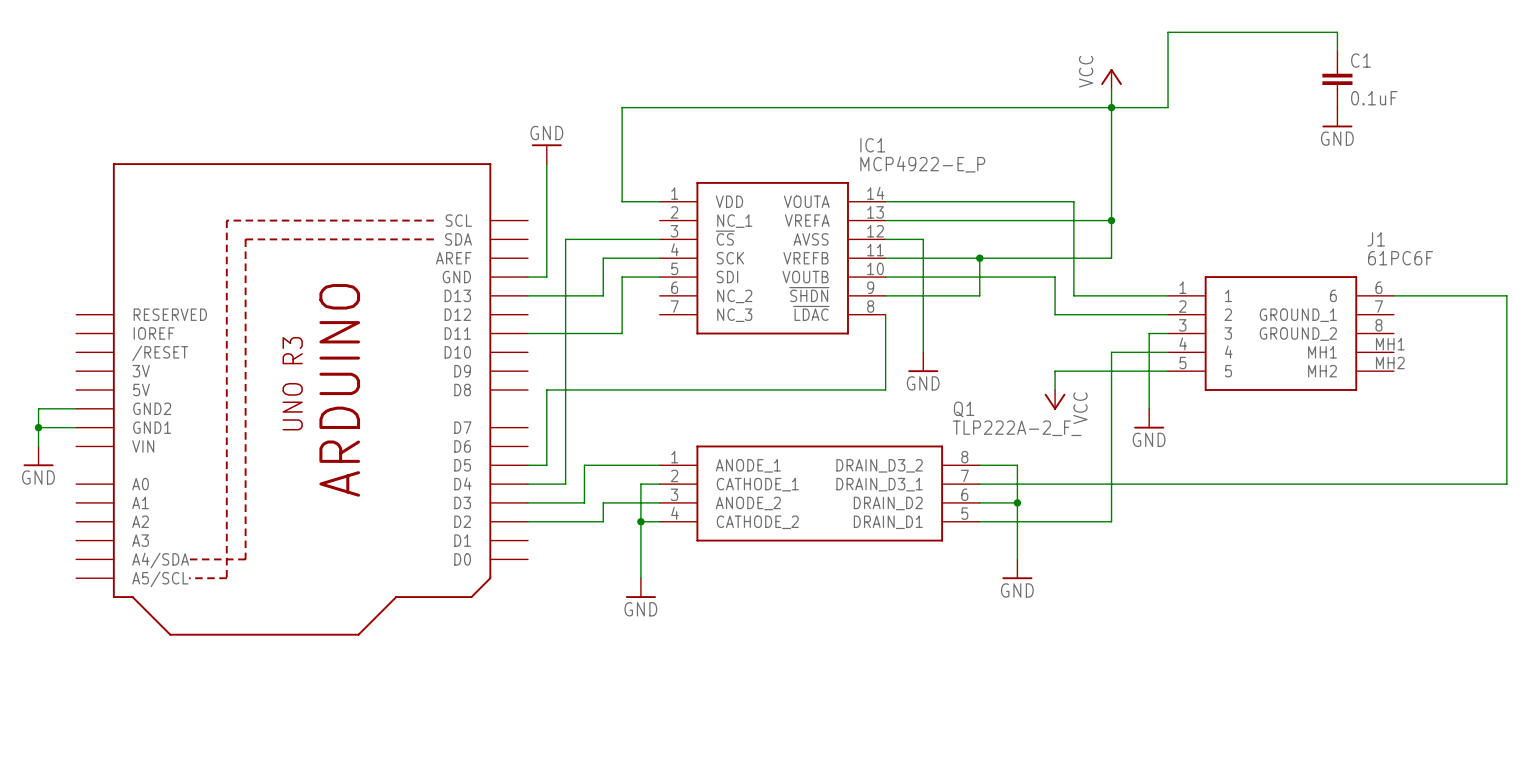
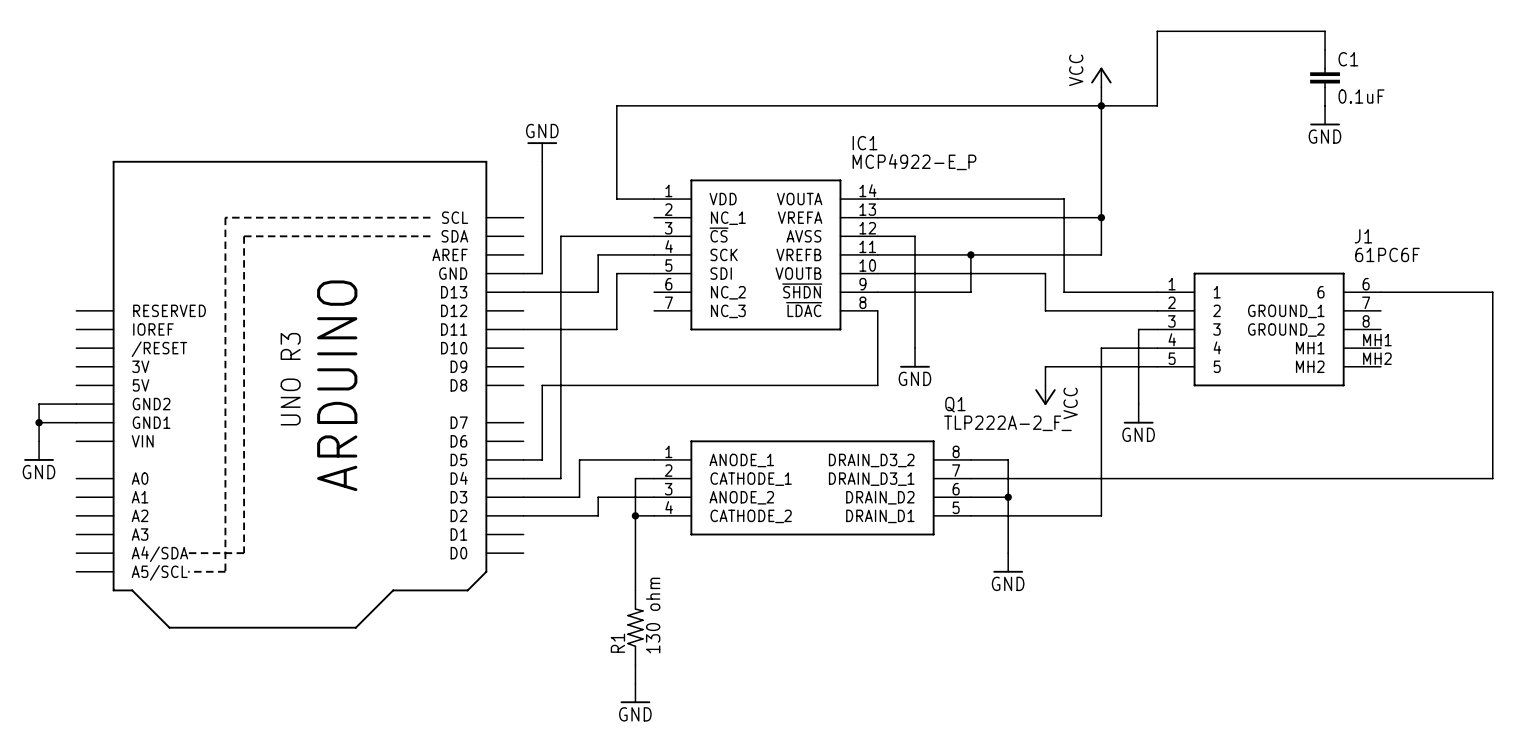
power symbol position: GND (640, 588) -> GND (635, 693)
R1: none -> 130 ohm (635, 627)
wire: none -> (635, 664) (635, 683)

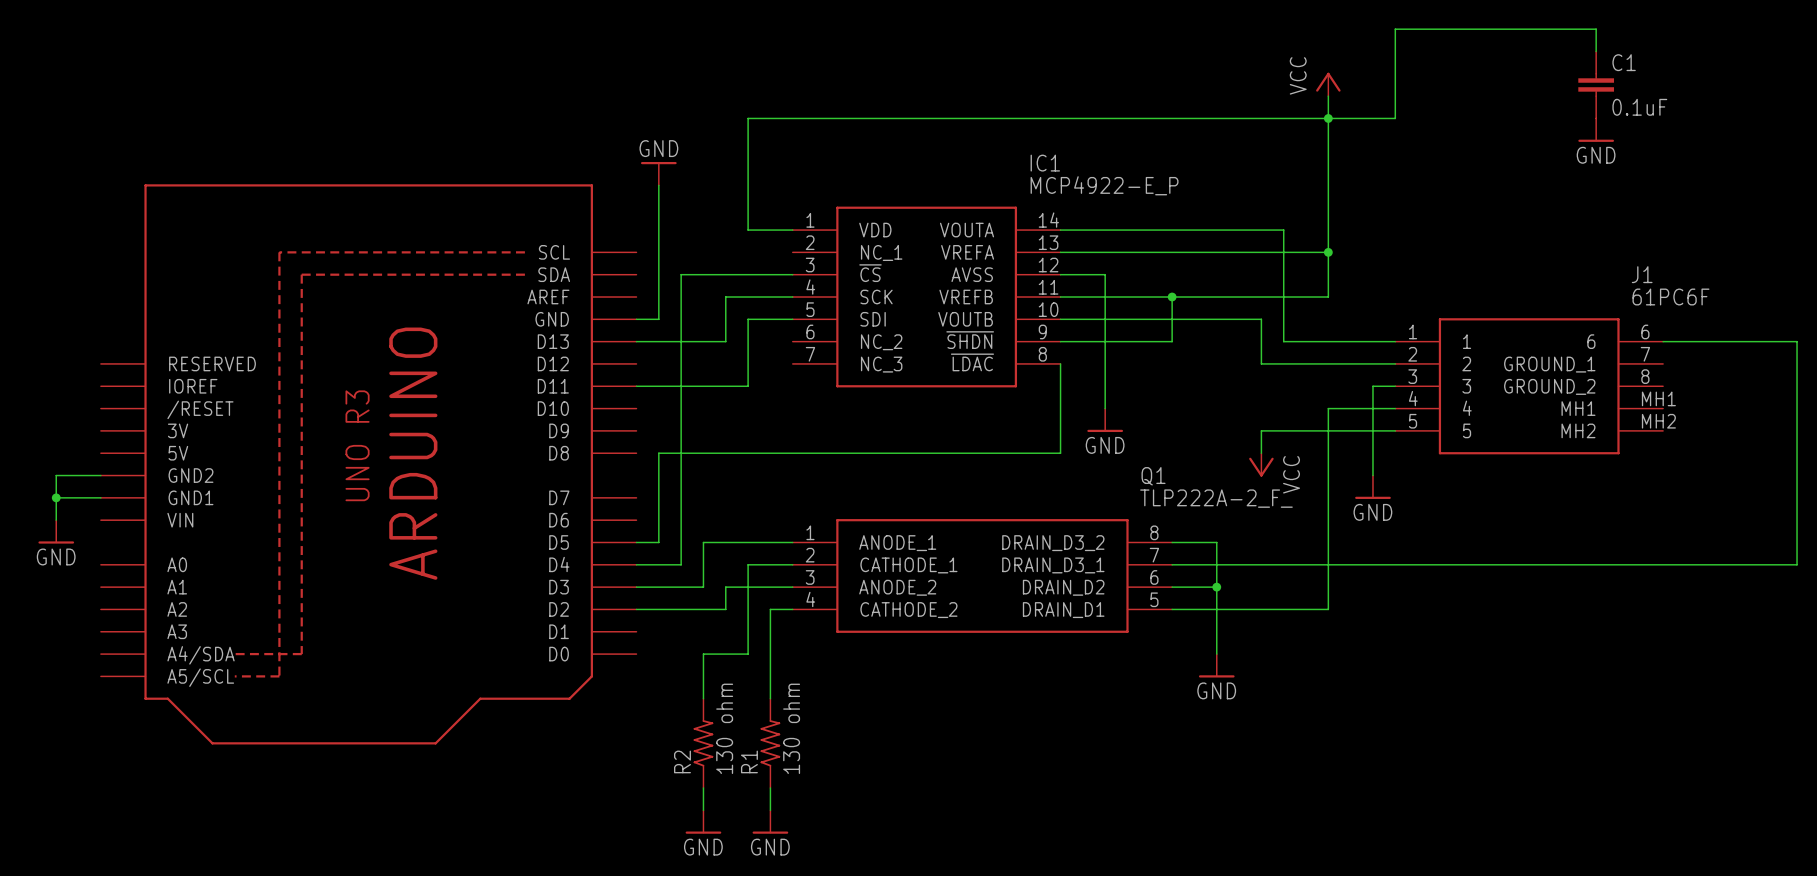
wire: (635, 478) (635, 515) -> (770, 564) (748, 564) (748, 654) (703, 654) (703, 698)
junction: (635, 515) -> none
R2: none -> 130 ohm (703, 743)
wire: none -> (703, 787) (703, 810)
power symbol: none -> GND (703, 822)

